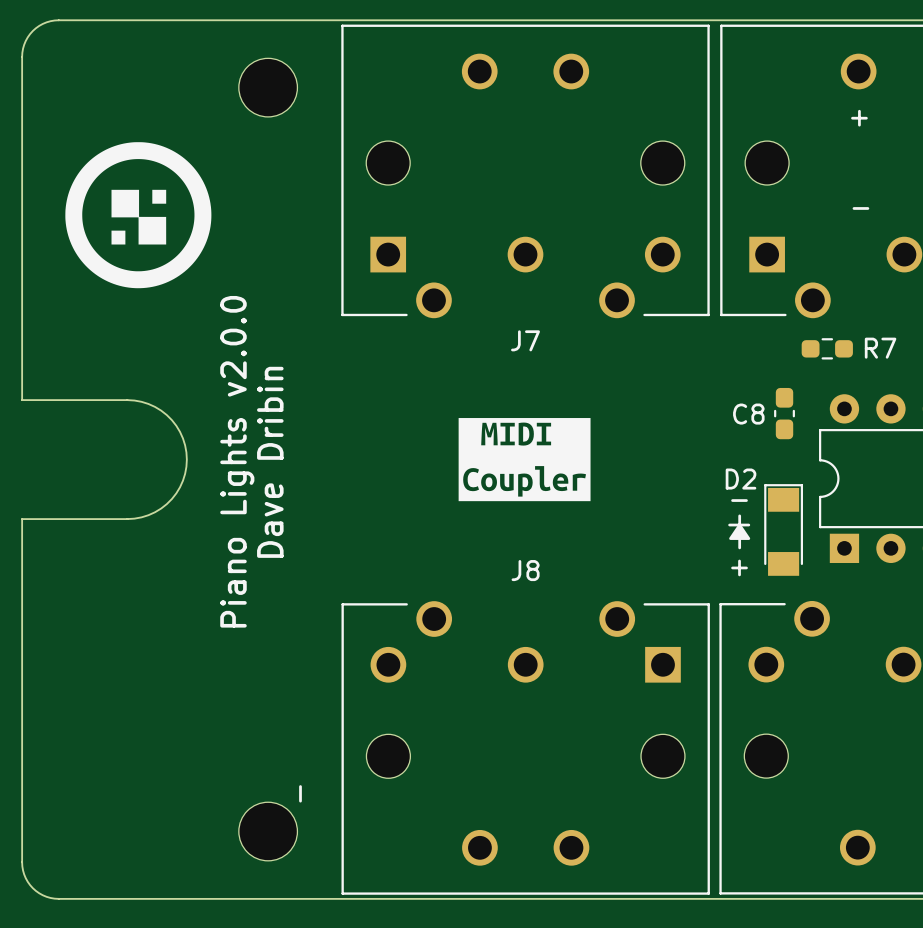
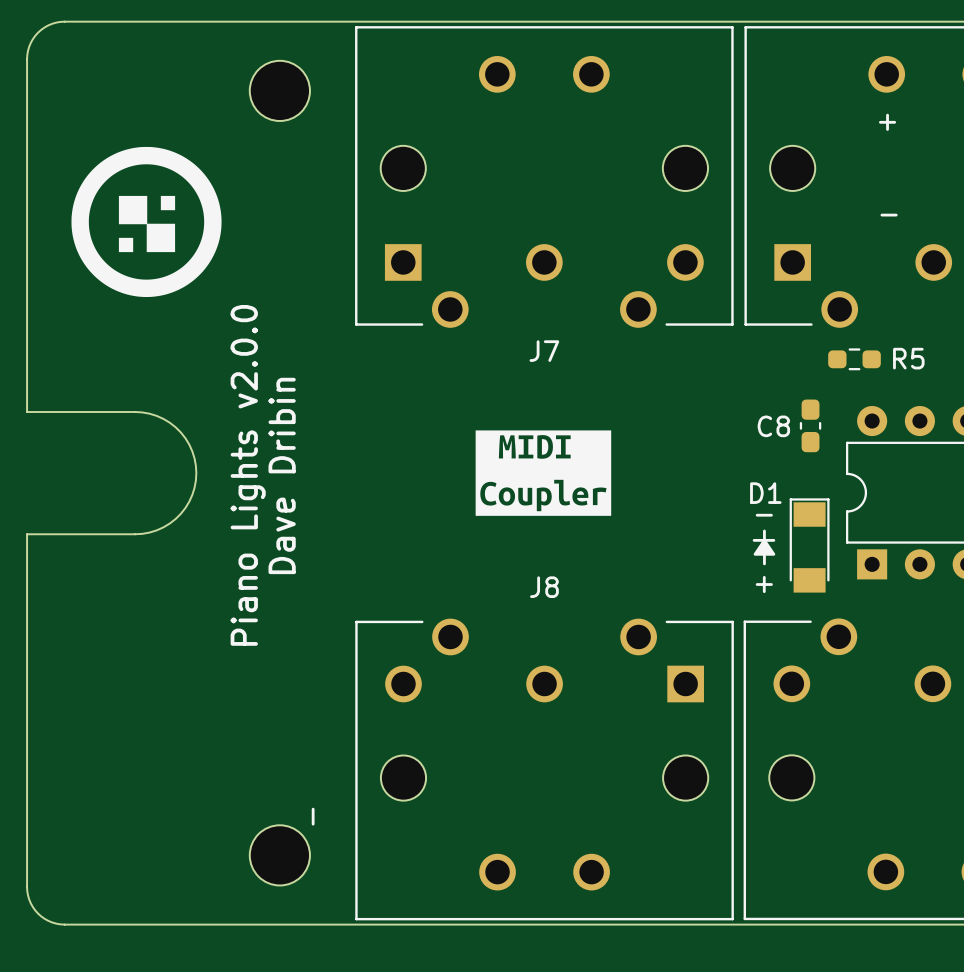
R7 name: R7 (880, 348) -> R5 (908, 358)
D2 name: D2 (741, 479) -> D1 (765, 493)

